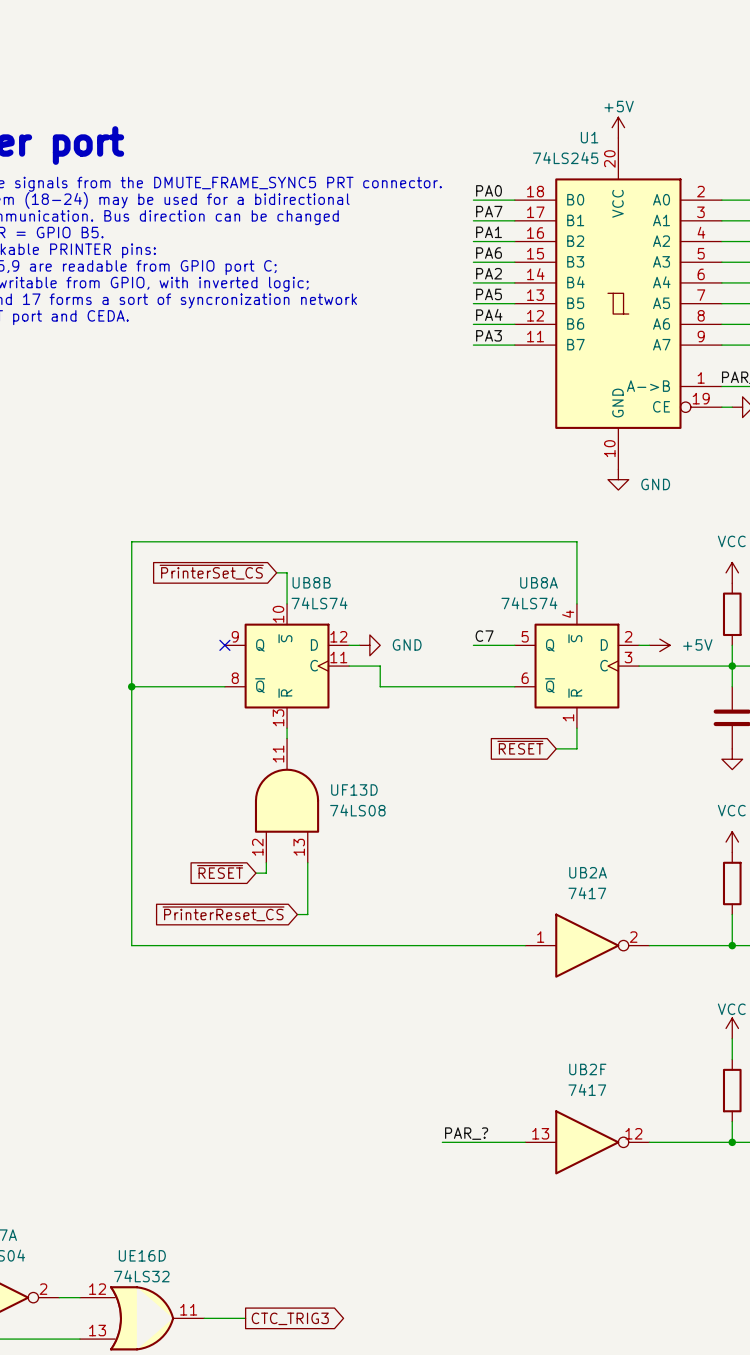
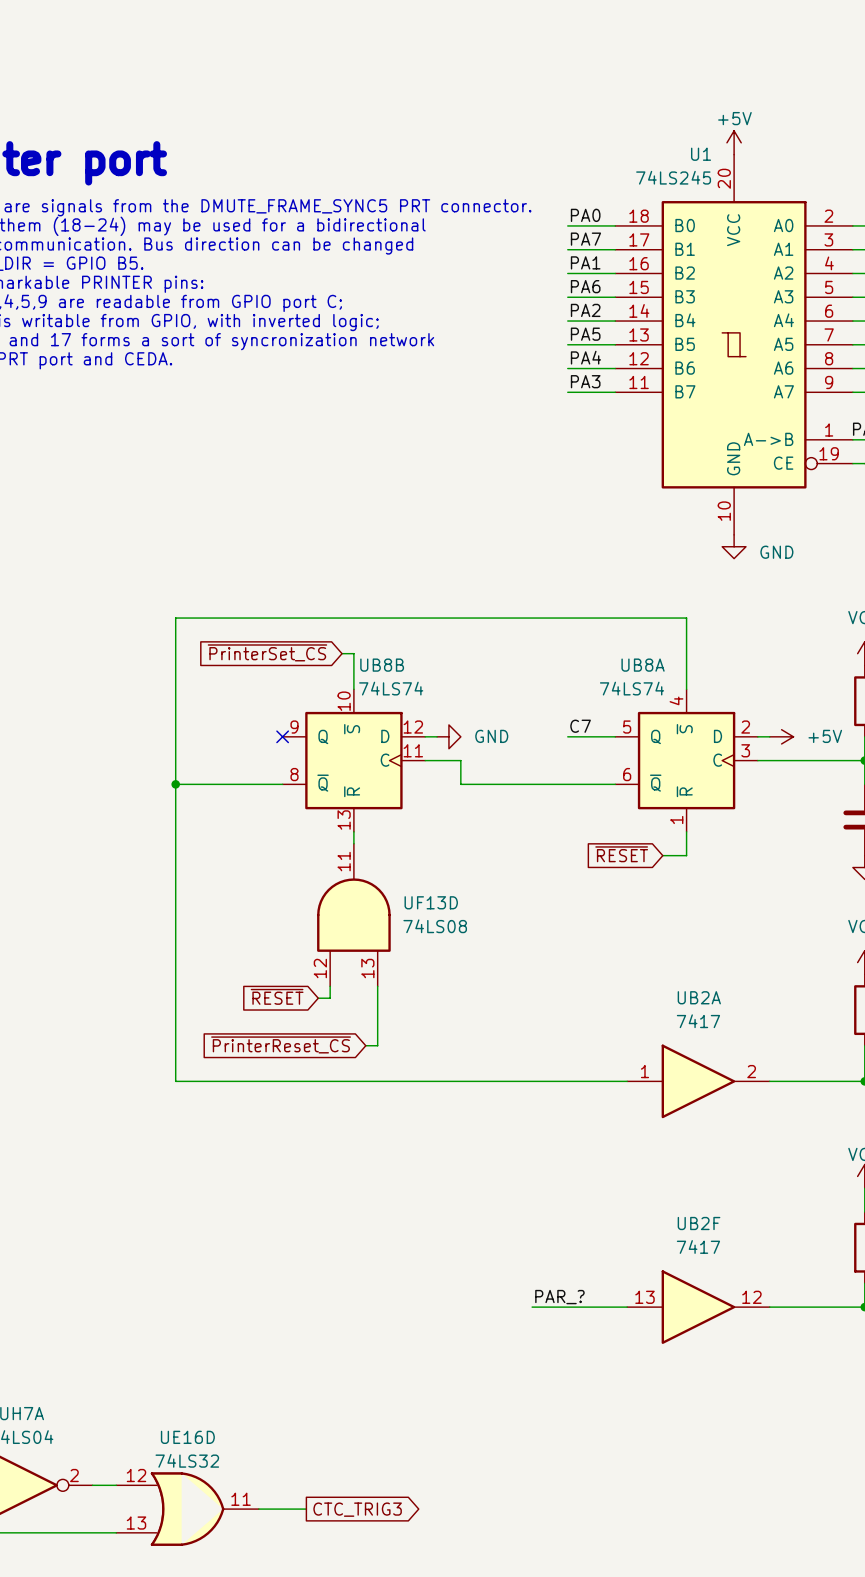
UB2A symbol: [525, 913, 650, 978] -> [627, 1044, 770, 1119]
UB2F symbol: [525, 1110, 650, 1175] -> [627, 1270, 770, 1344]

